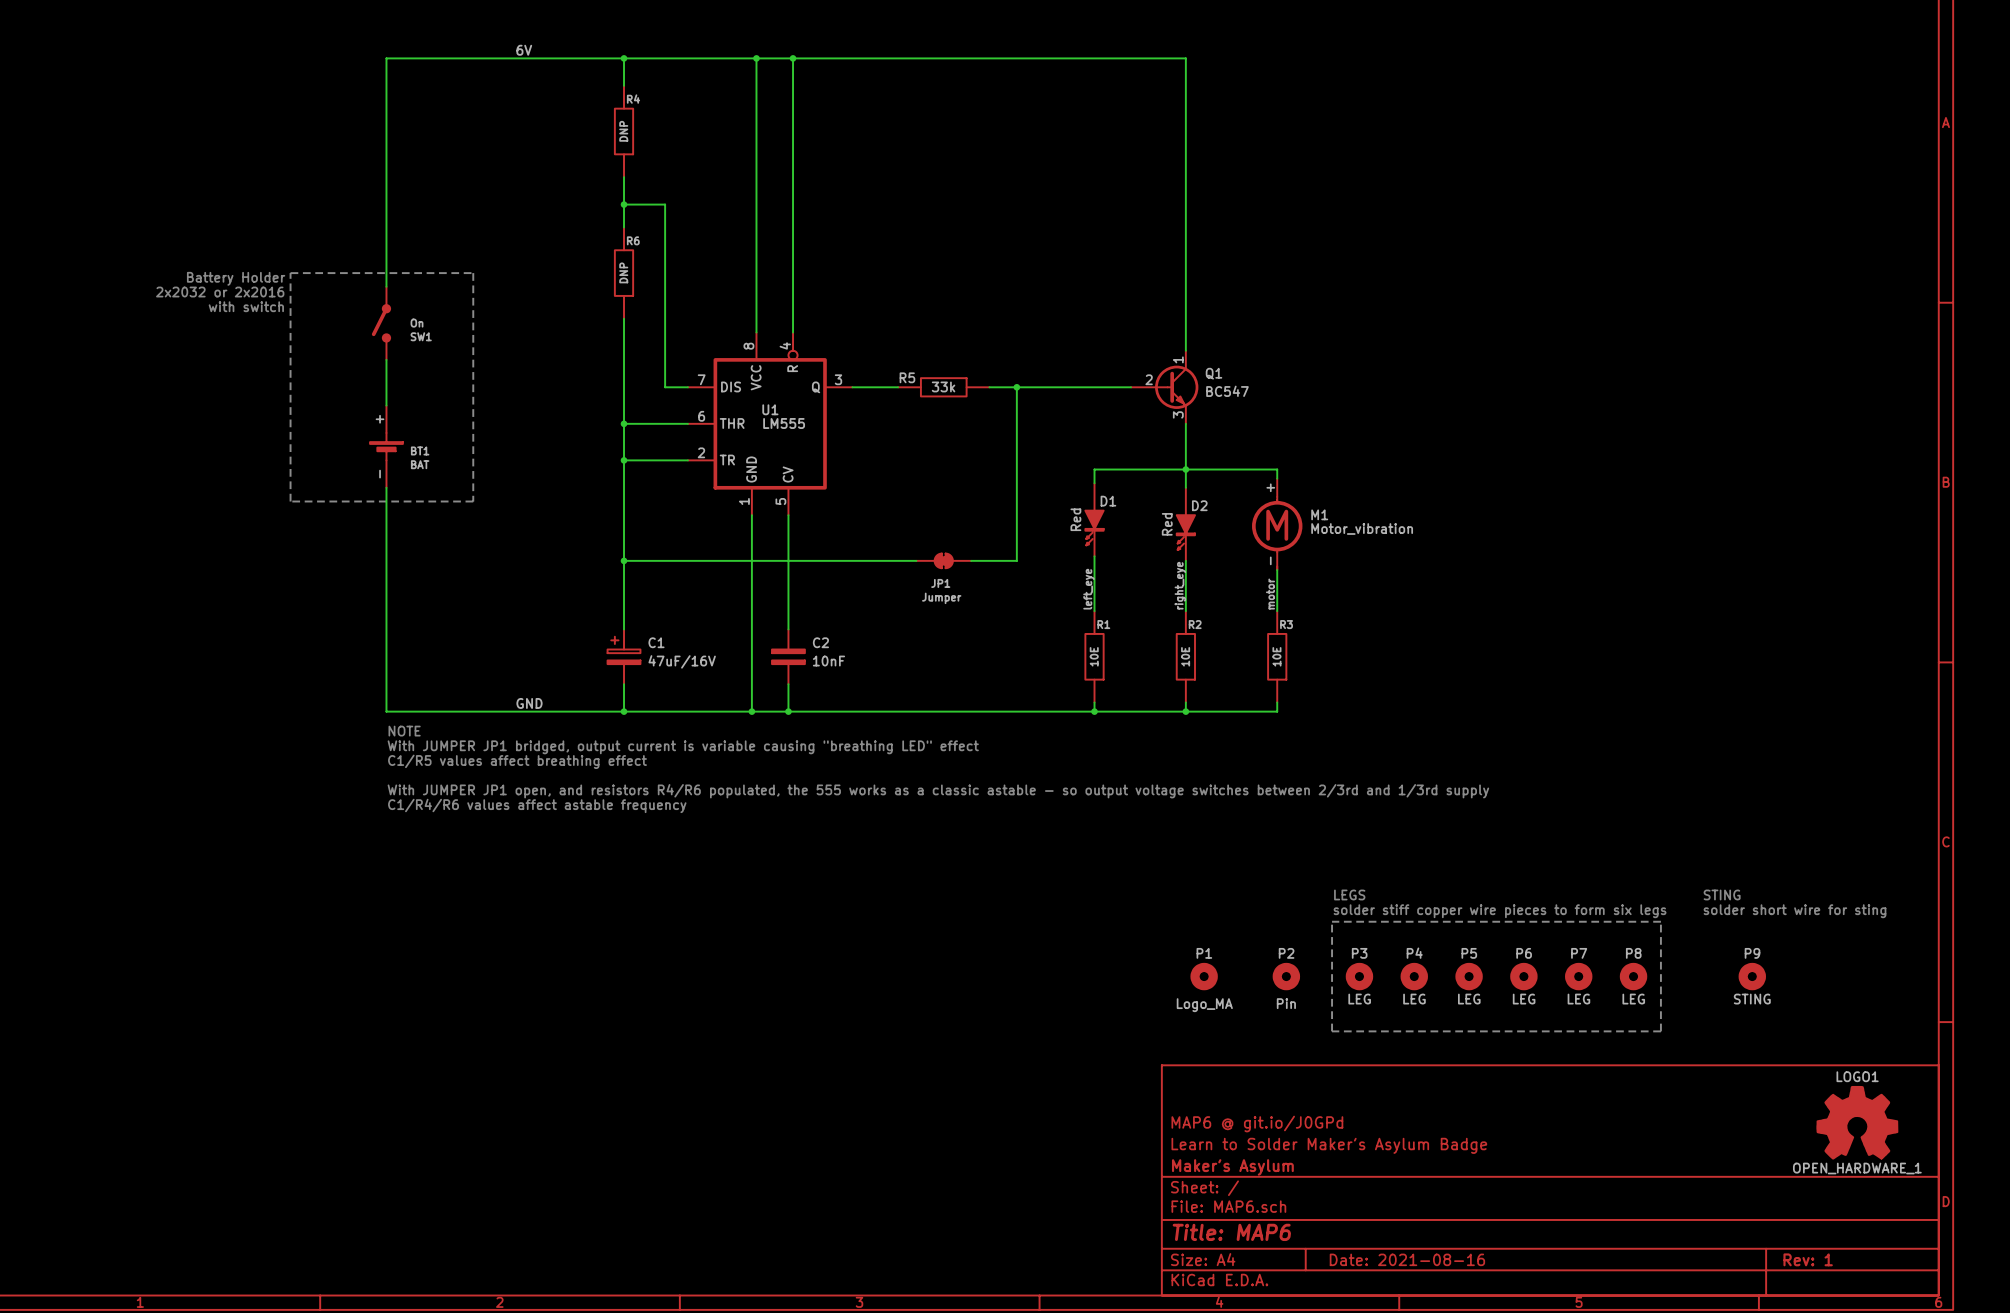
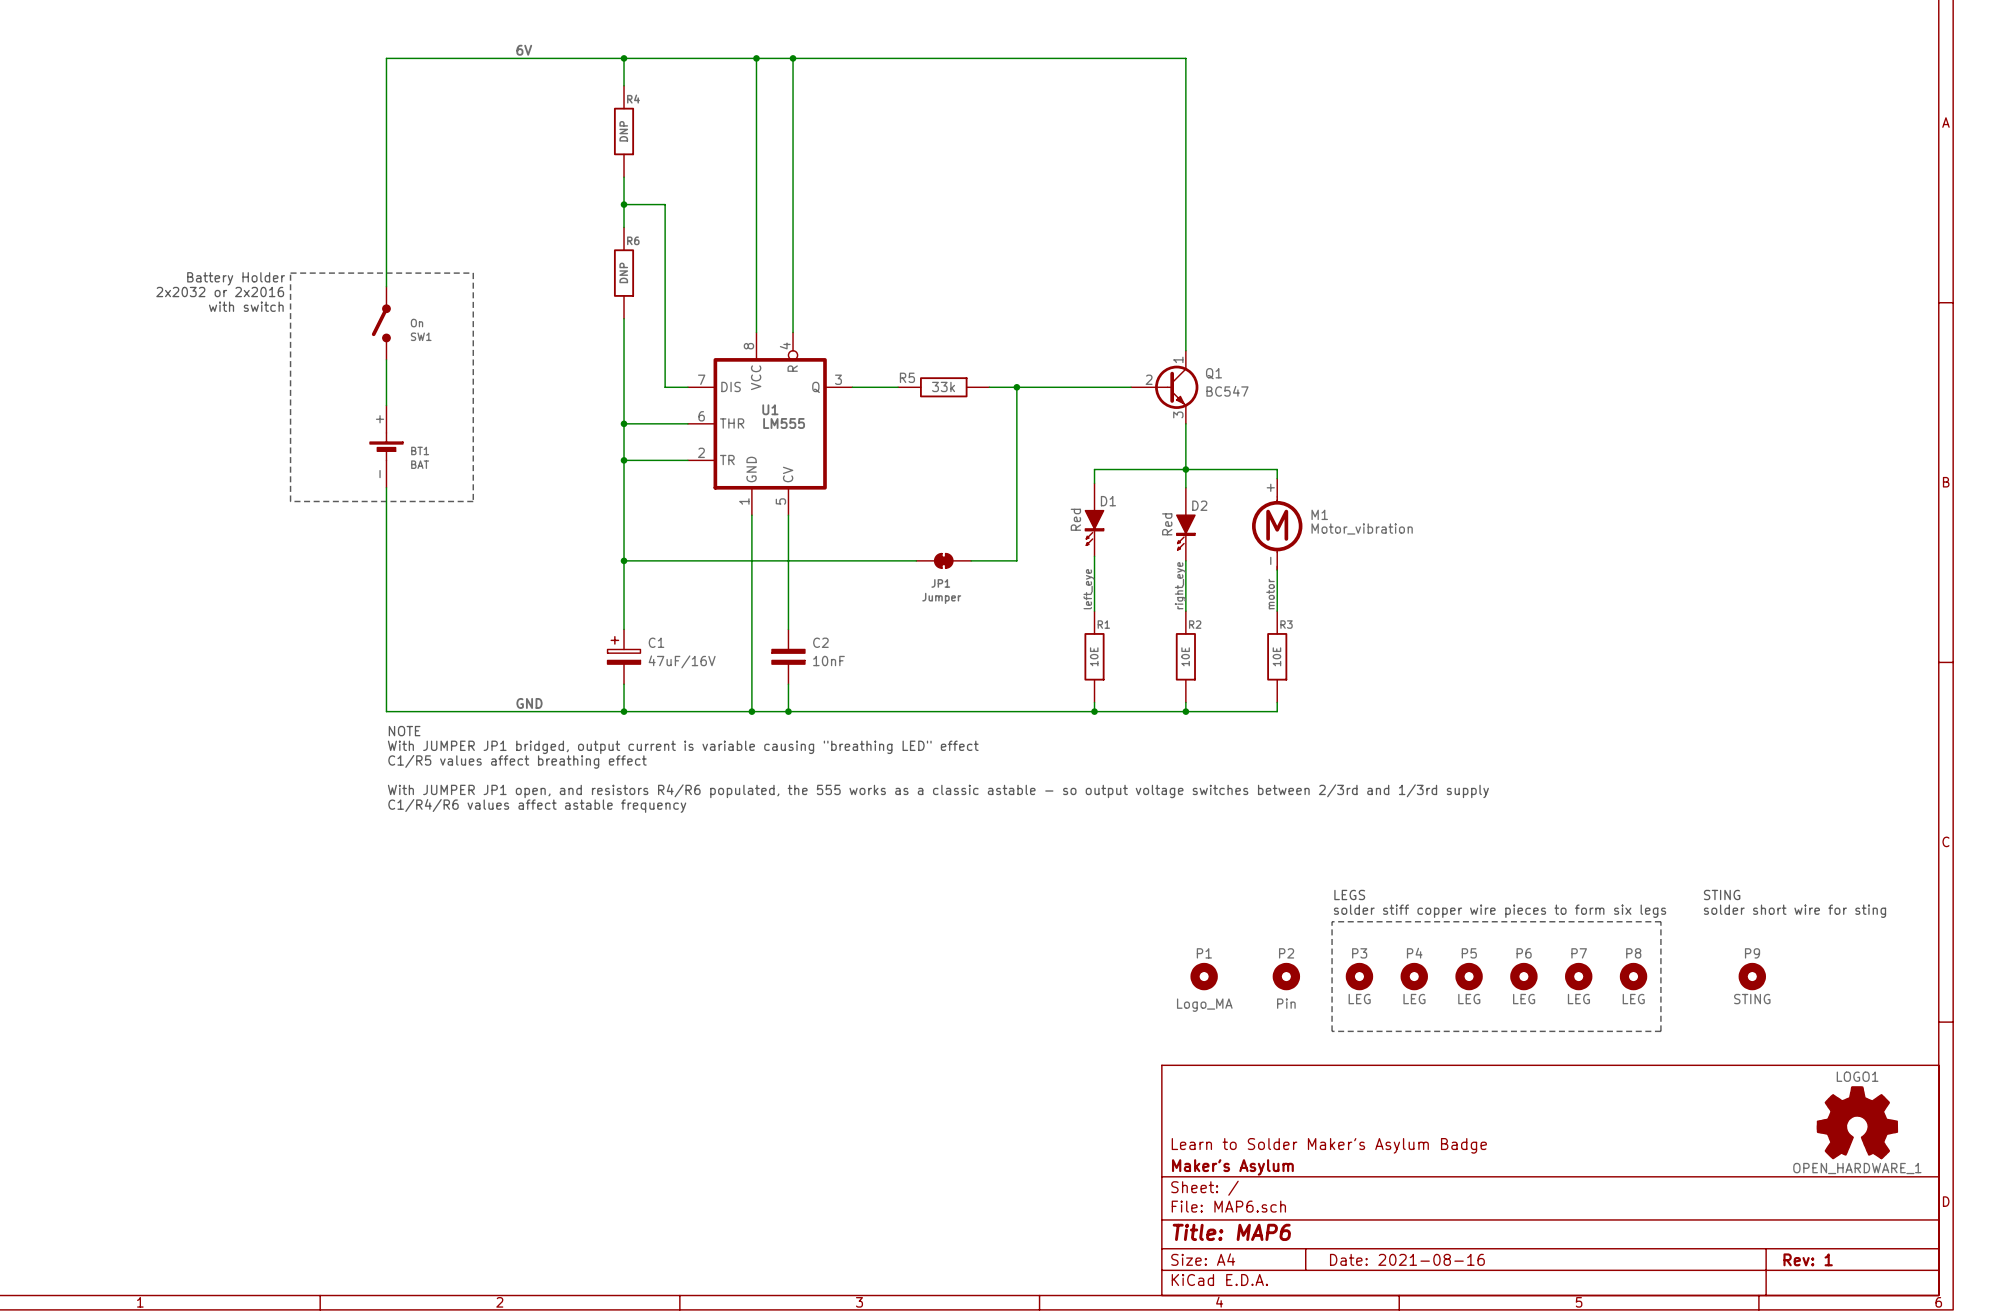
title block: MAP6 @ git.io/J0GPd (1257, 1124) -> none

